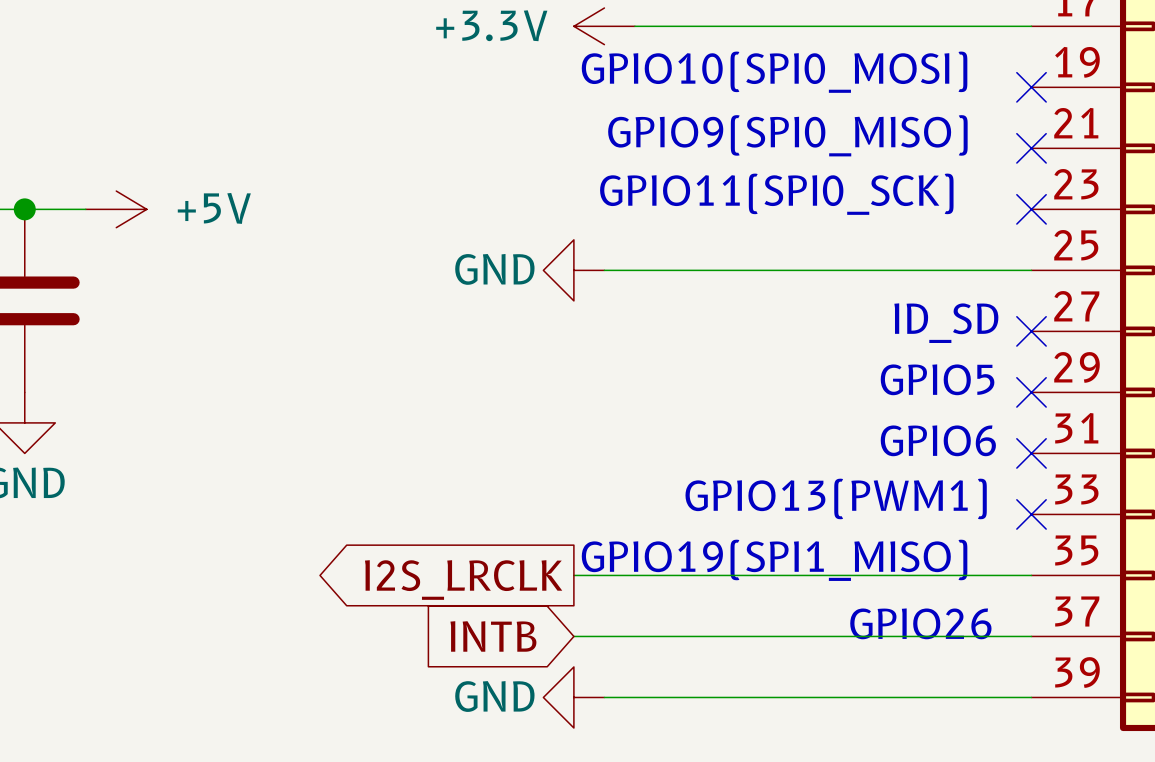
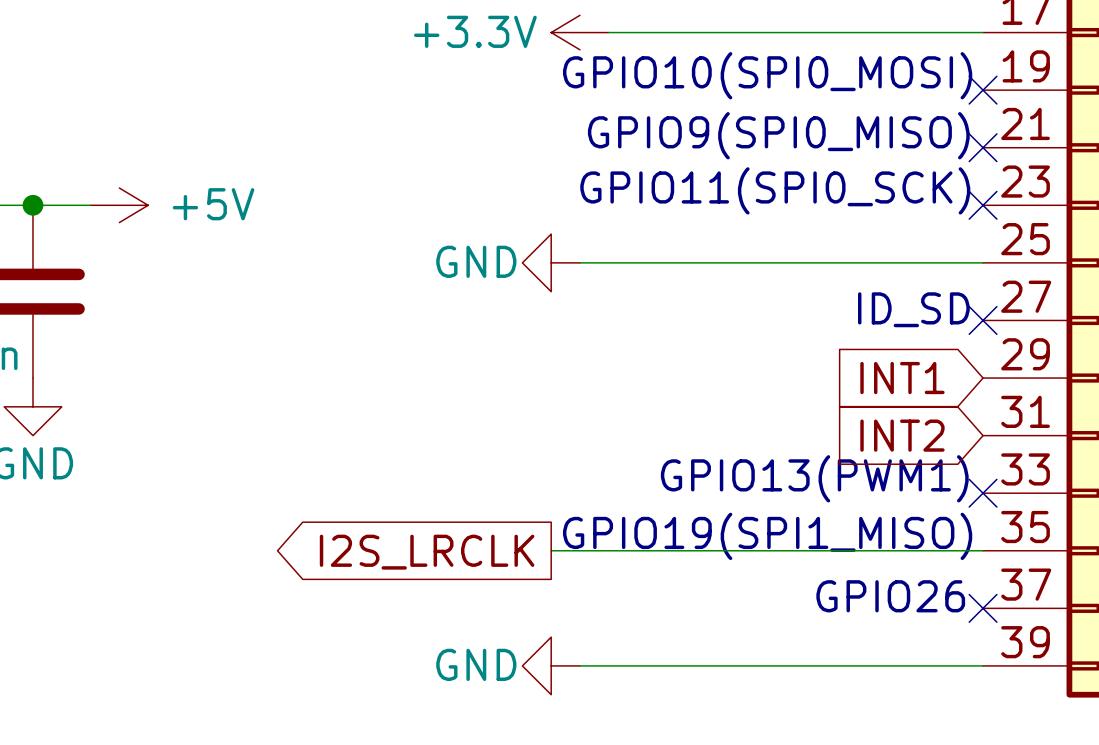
text: GPIO5 (937, 379) -> none
global label: none -> INT1 (902, 378)
no-connect mark: (1031, 392) -> none
text: GPIO6 (938, 440) -> none
global label: none -> INT2 (902, 435)
no-connect mark: (1031, 453) -> none
global label: INTB (493, 636) -> none
wire: (573, 636) (1031, 636) -> none
no-connect mark: none -> (983, 608)

